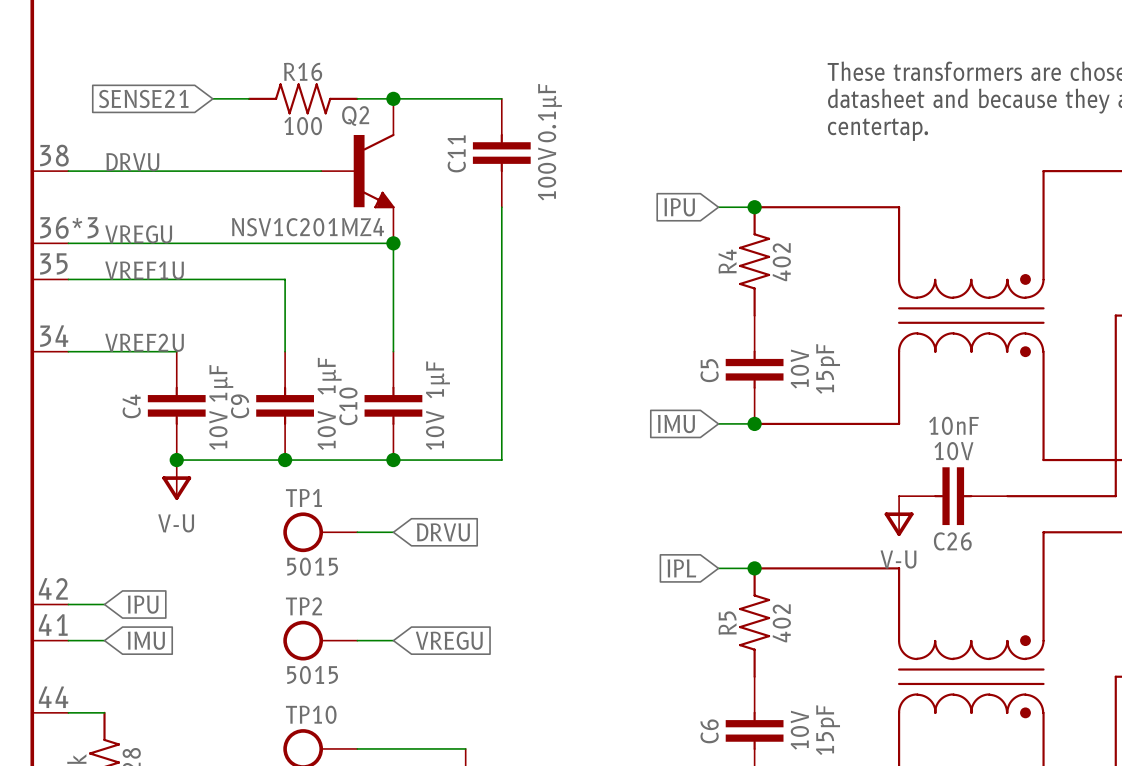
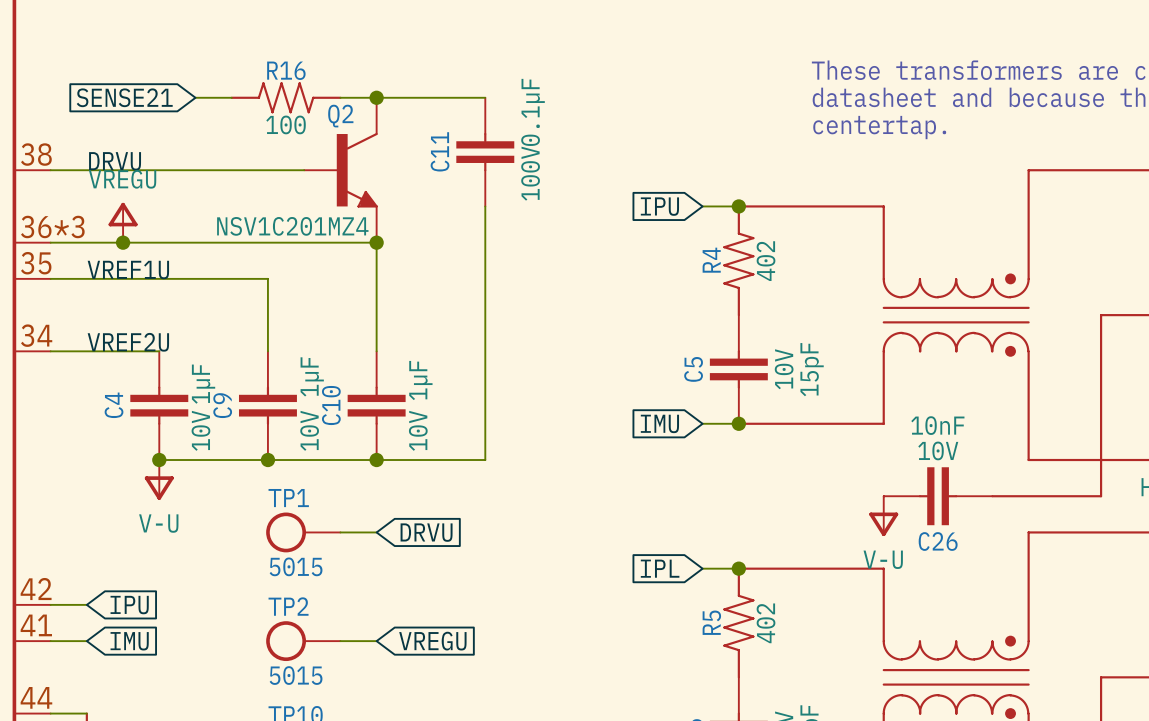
power symbol: none -> VREGU (123, 222)
label: VREGU (138, 234) -> none
junction: none -> (123, 242)

